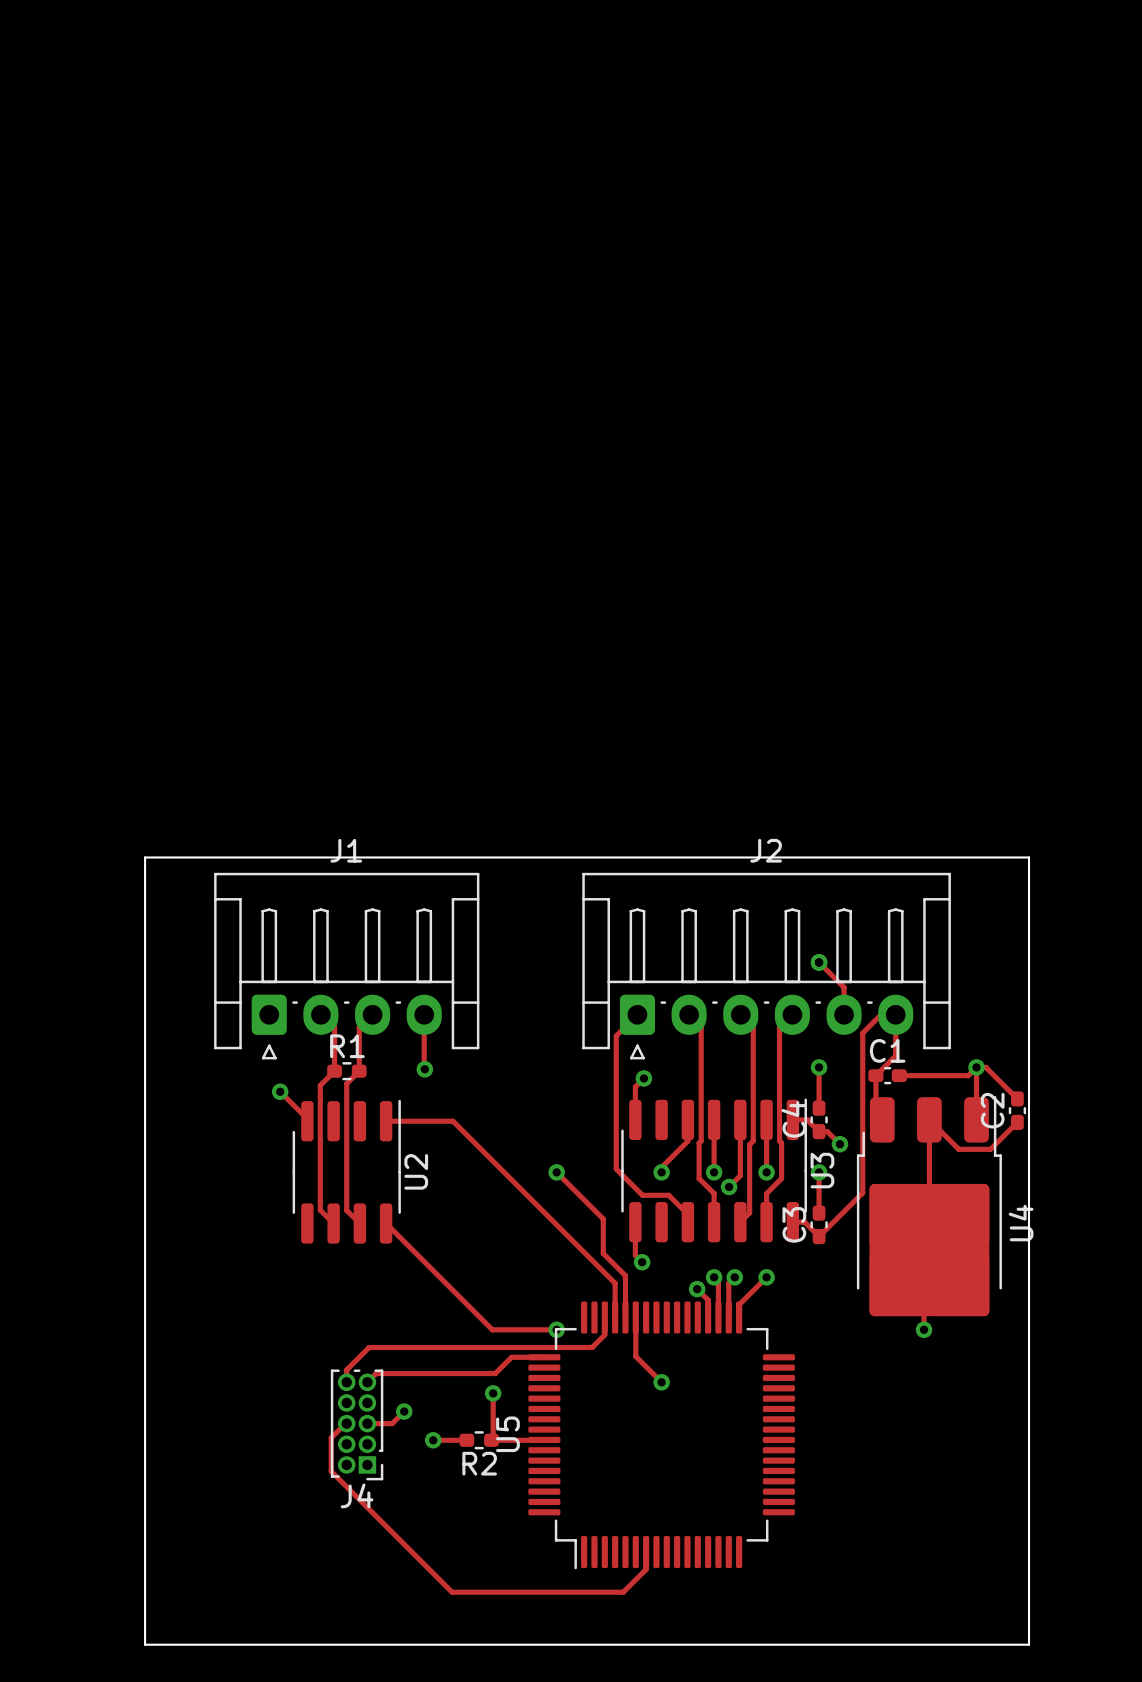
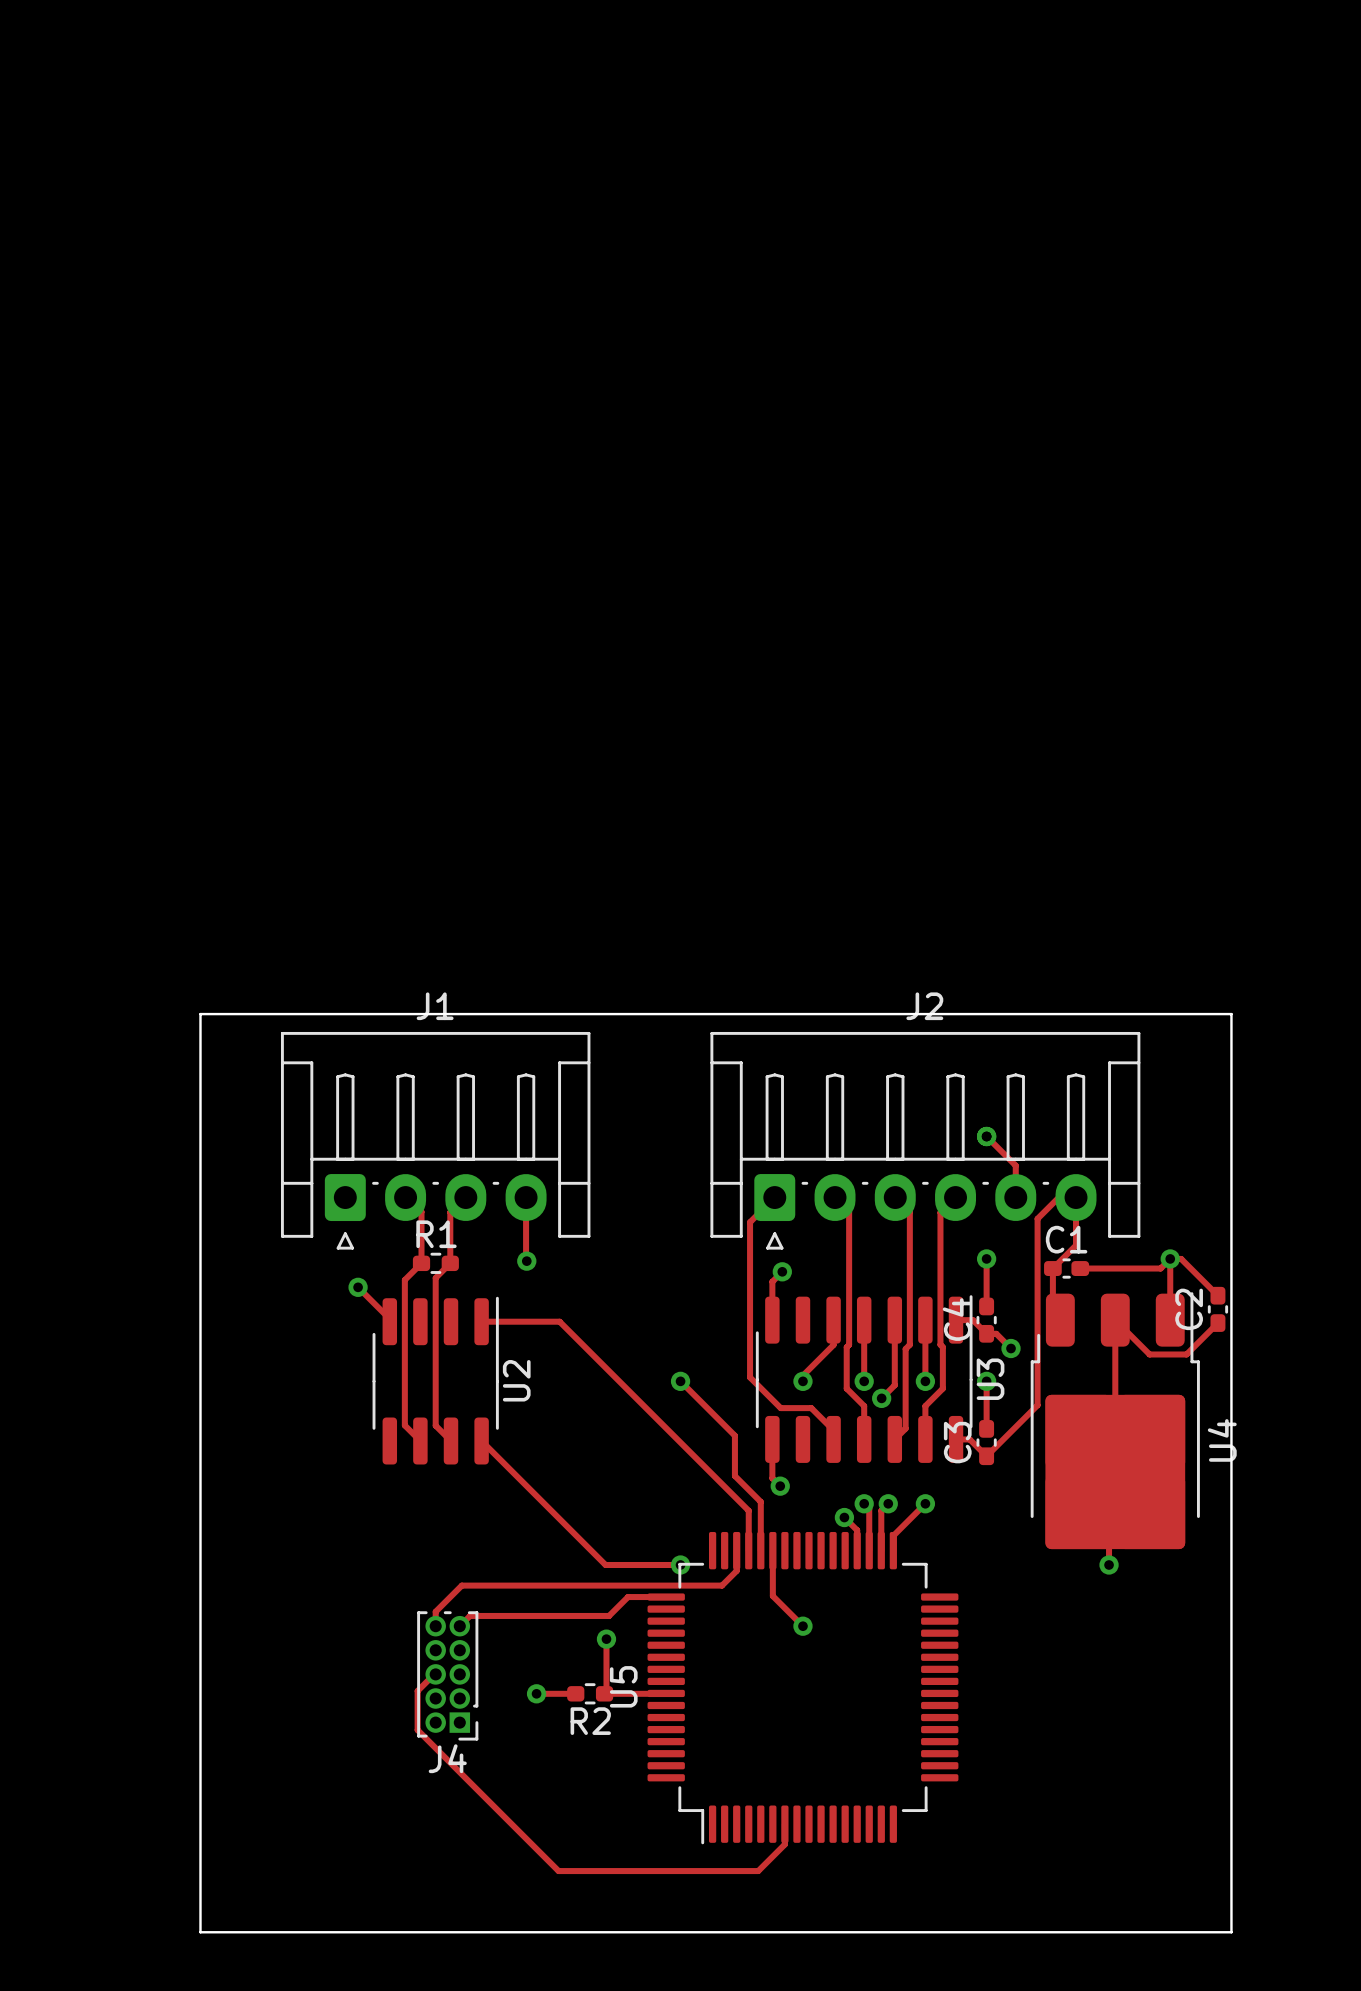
track: (404, 1411) (392, 1423) (367, 1423) -> none
via: (404, 1411) -> none

